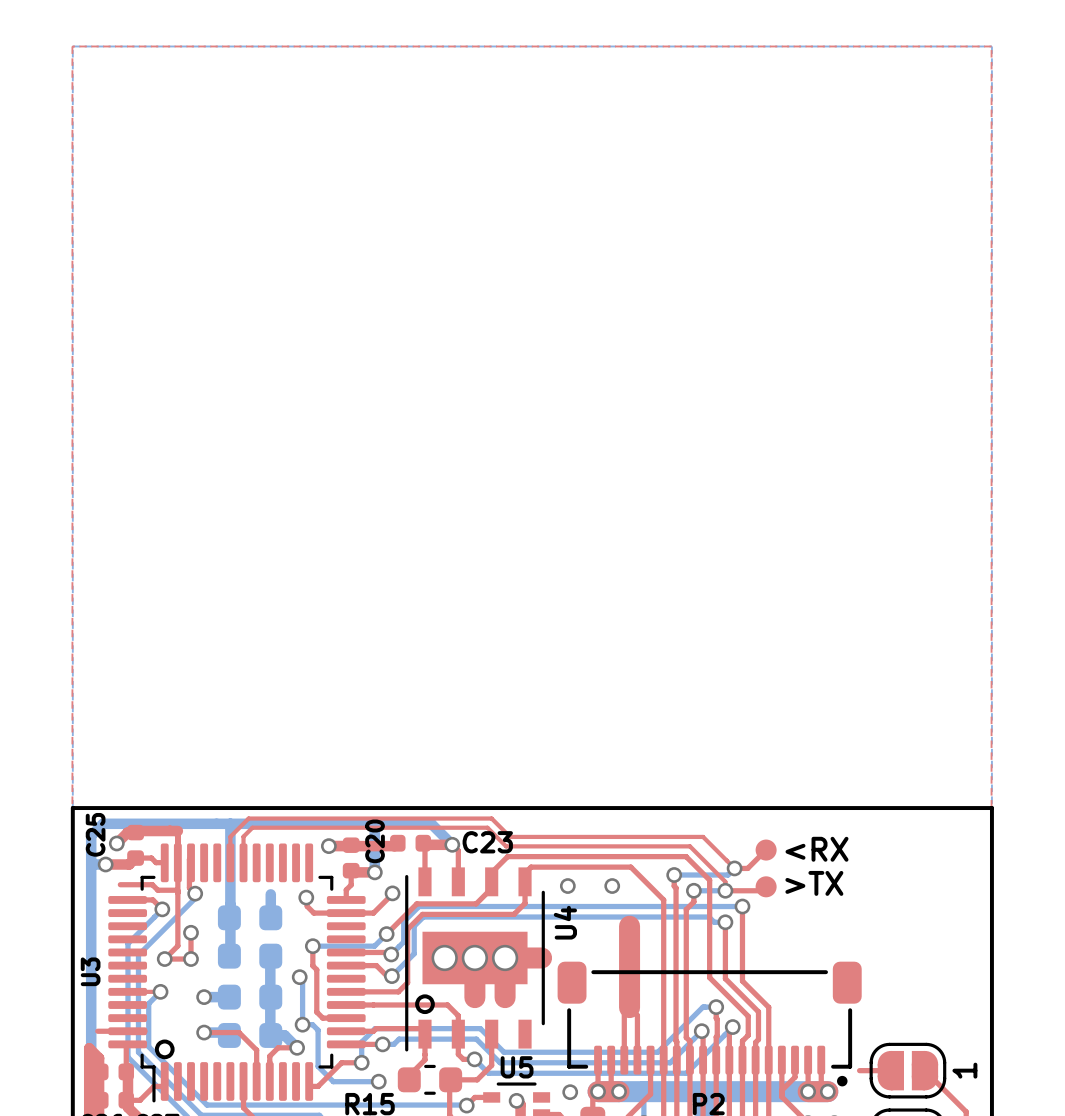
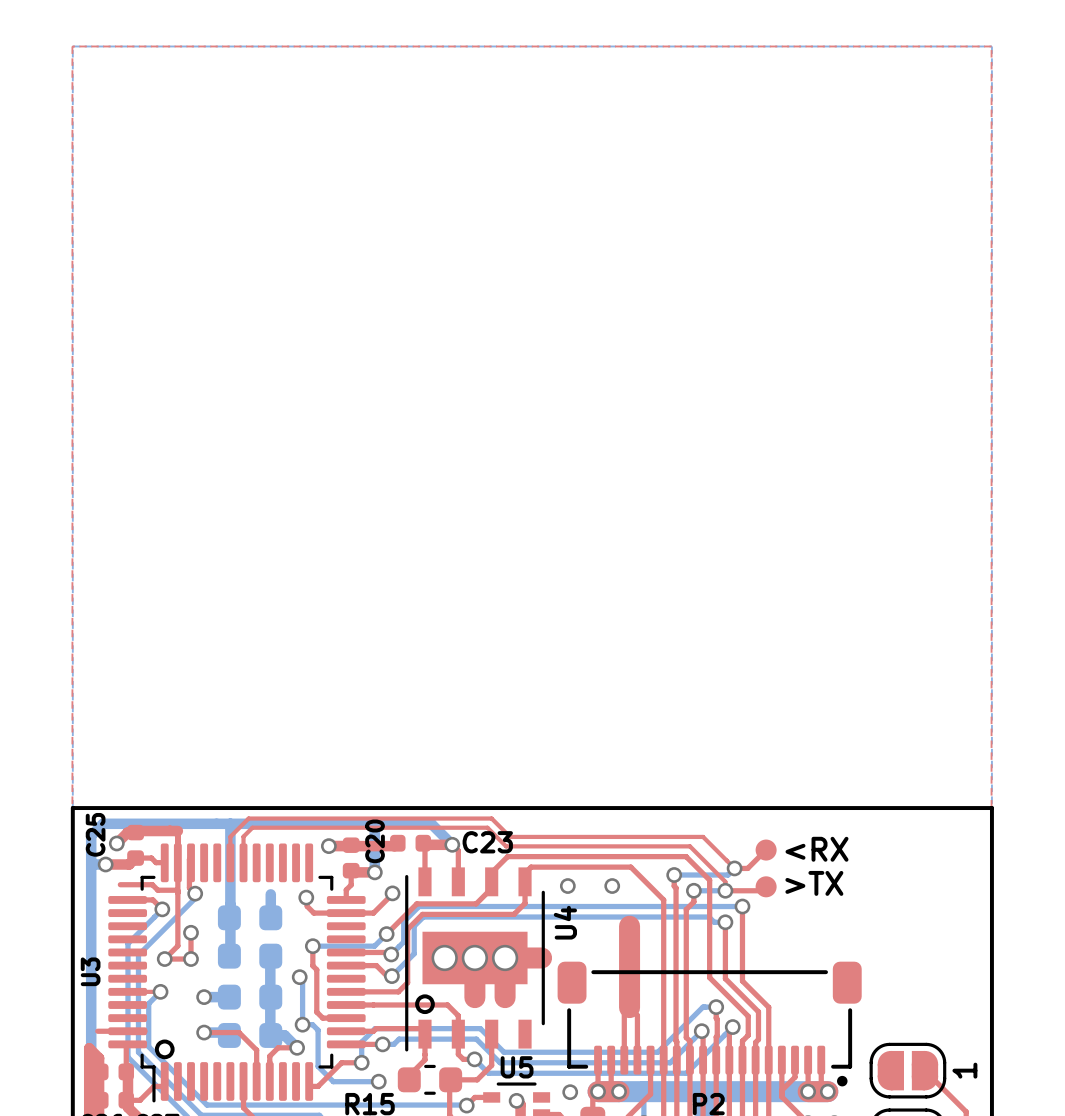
top track: (859, 1070) (890, 1070) -> none

